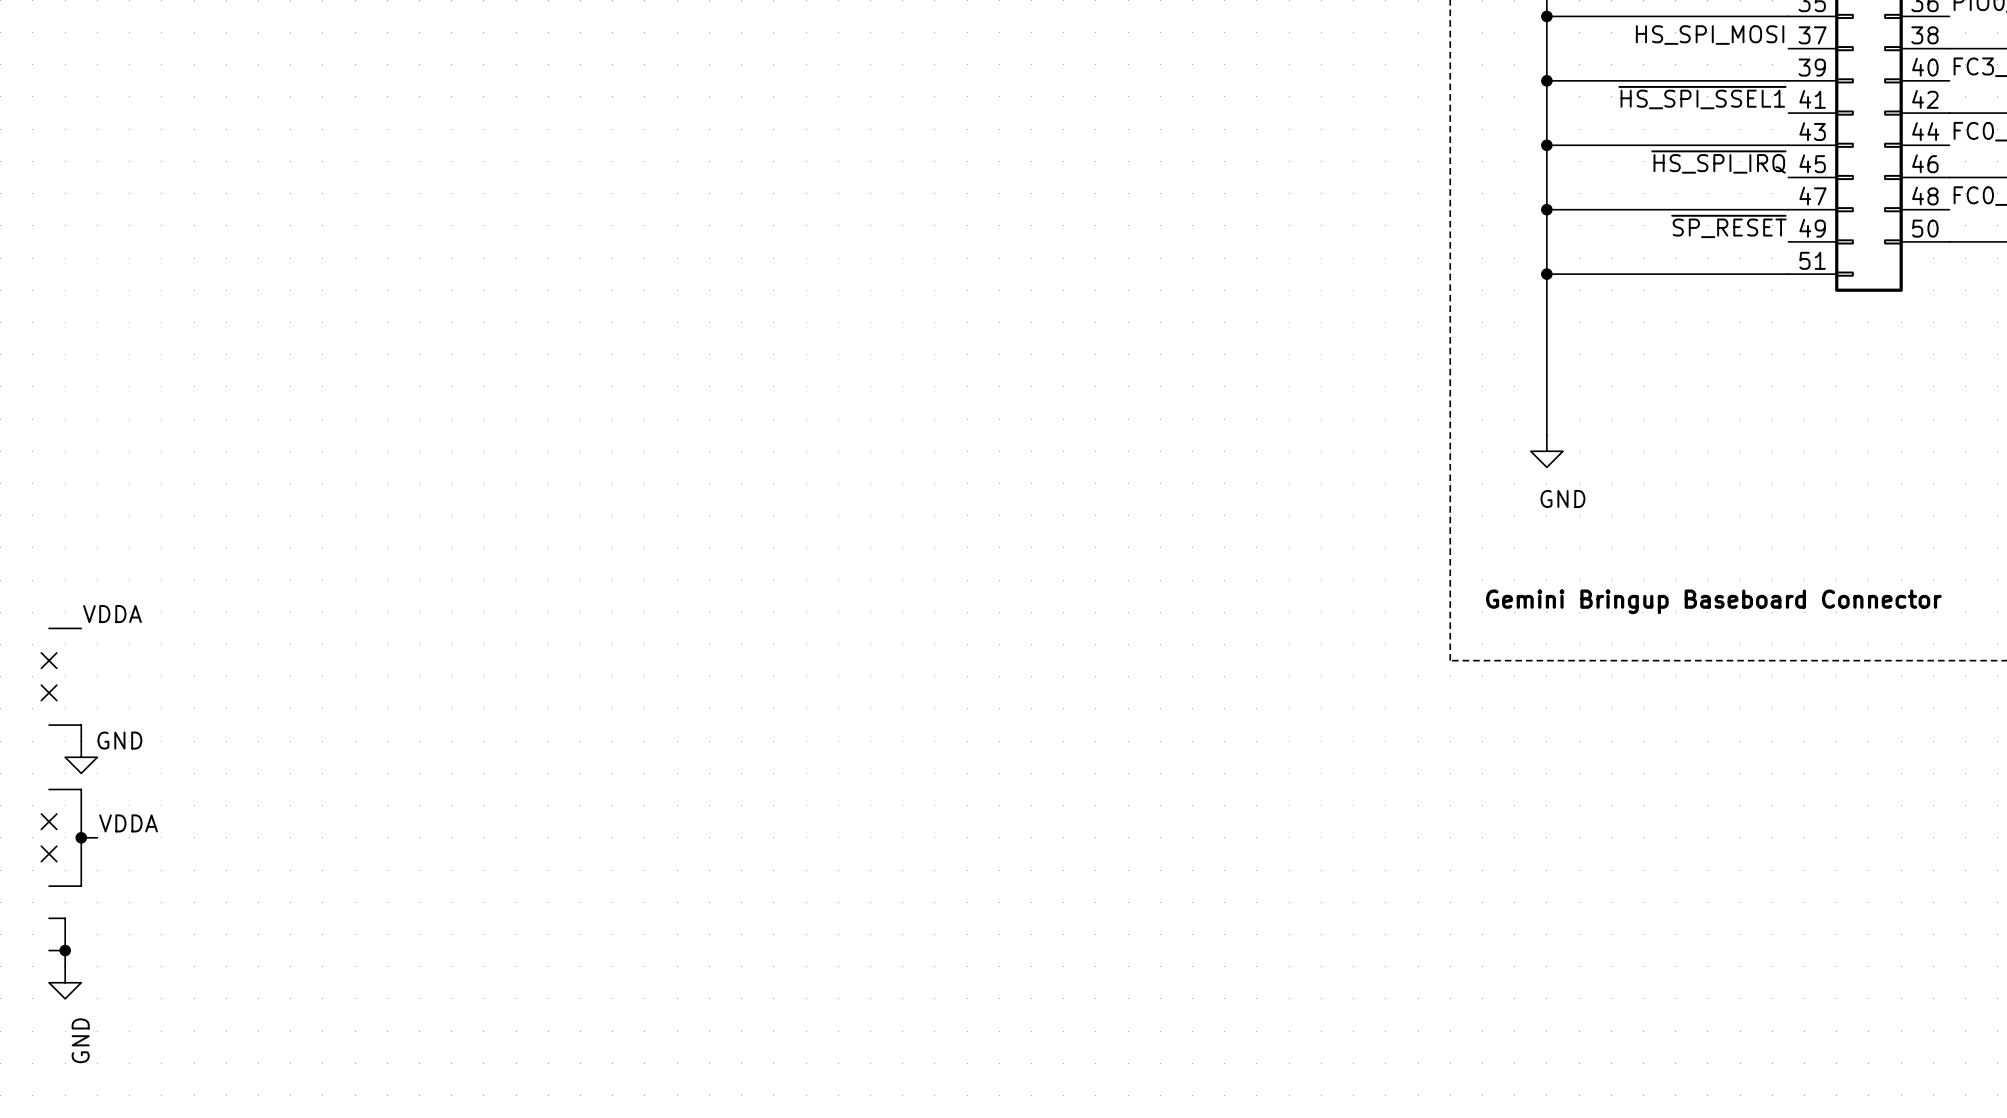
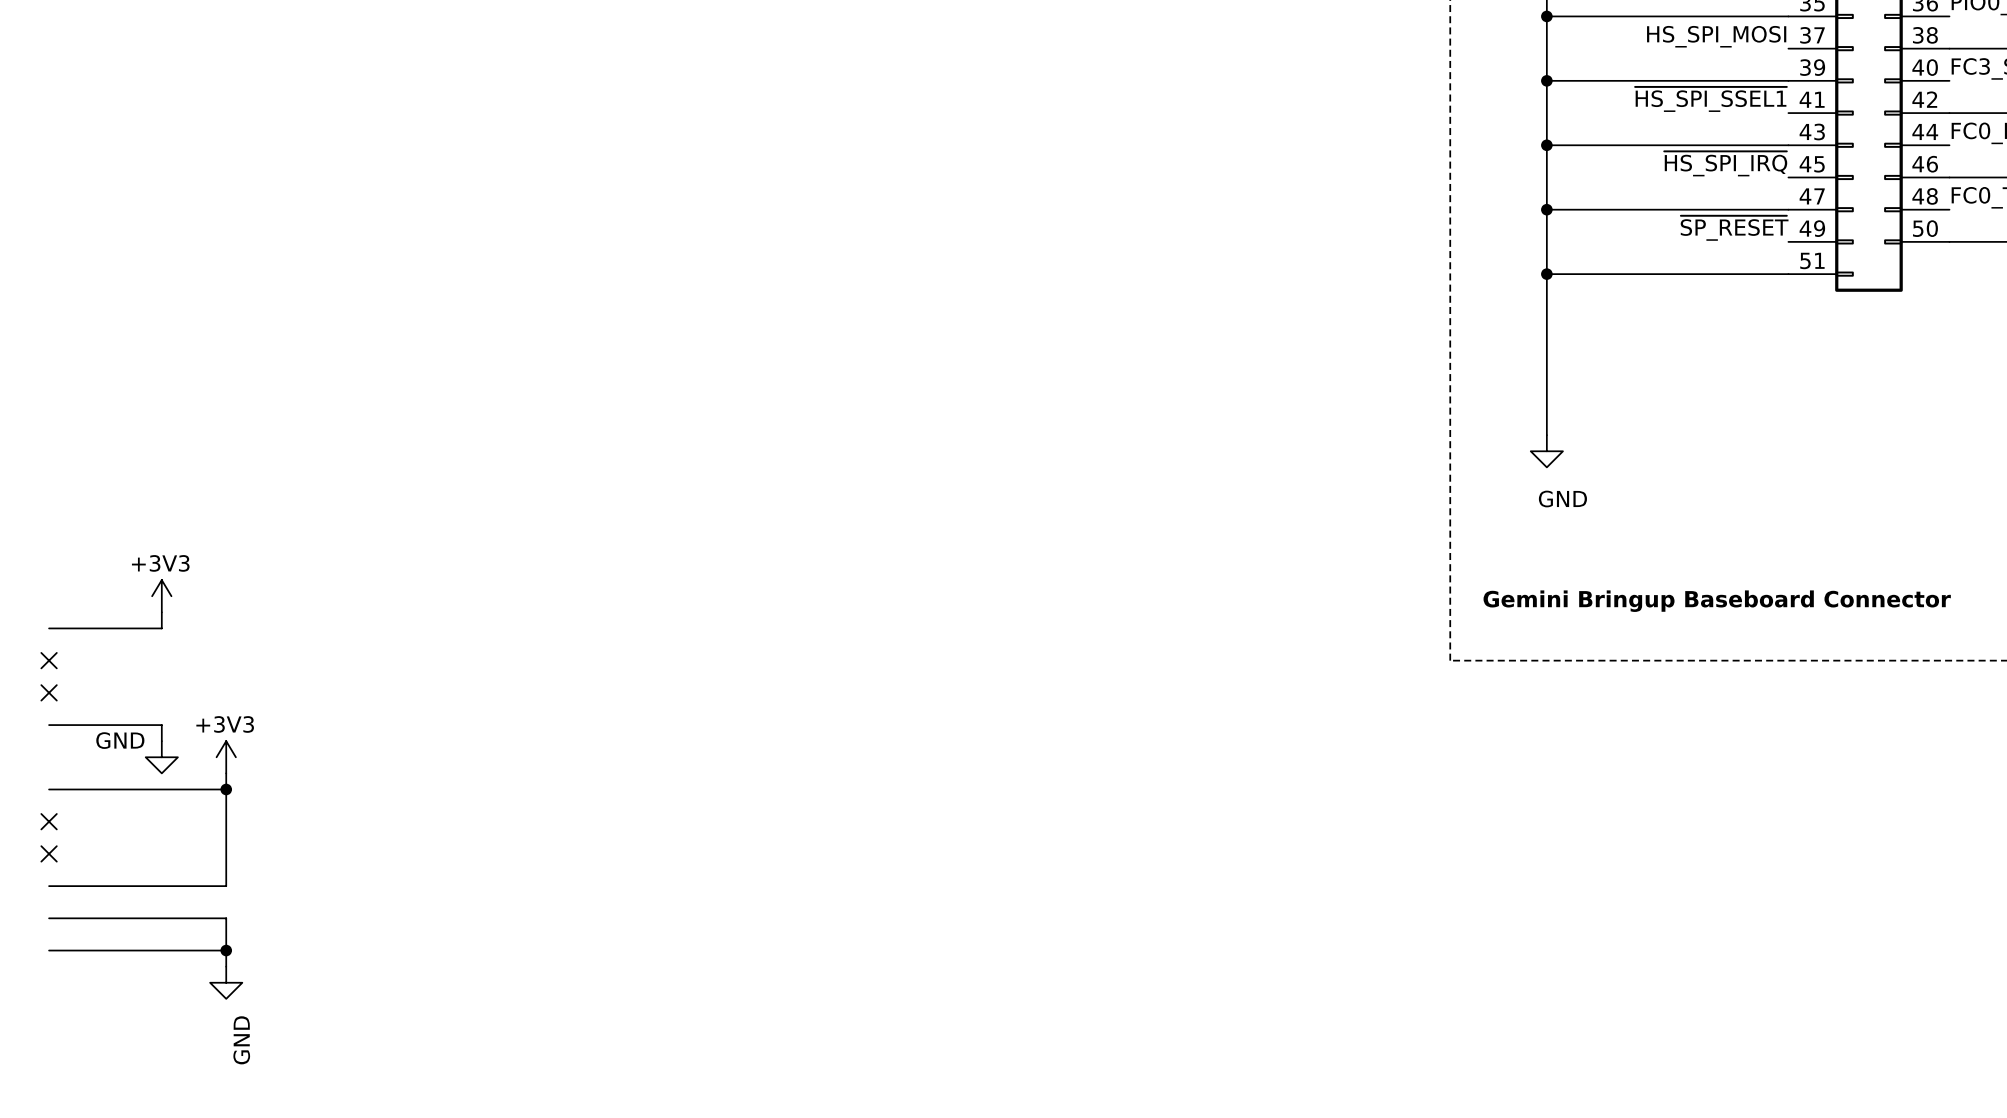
power symbol: none -> +3V3 (161, 596)
wire: none -> (161, 612) (161, 628) (81, 628)
label: VDDA (112, 614) -> none
wire: (81, 725) (81, 741) -> (81, 725) (161, 725) (161, 741)
power symbol position: GND (81, 757) -> GND (161, 757)
power symbol: none -> +3V3 (226, 757)
wire: (81, 789) (81, 886) -> (226, 773) (226, 886) (81, 886)
wire: none -> (81, 789) (226, 789)
junction: none -> (226, 789)
label: VDDA (128, 823) -> none
wire: (81, 837) (97, 837) -> none
junction: (81, 837) -> none
wire: (65, 918) (65, 966) -> (65, 918) (226, 918) (226, 966)
wire: none -> (65, 950) (226, 950)
junction: (65, 950) -> none
junction: none -> (226, 950)
power symbol: GND (65, 982) -> none
power symbol: none -> GND (226, 982)

